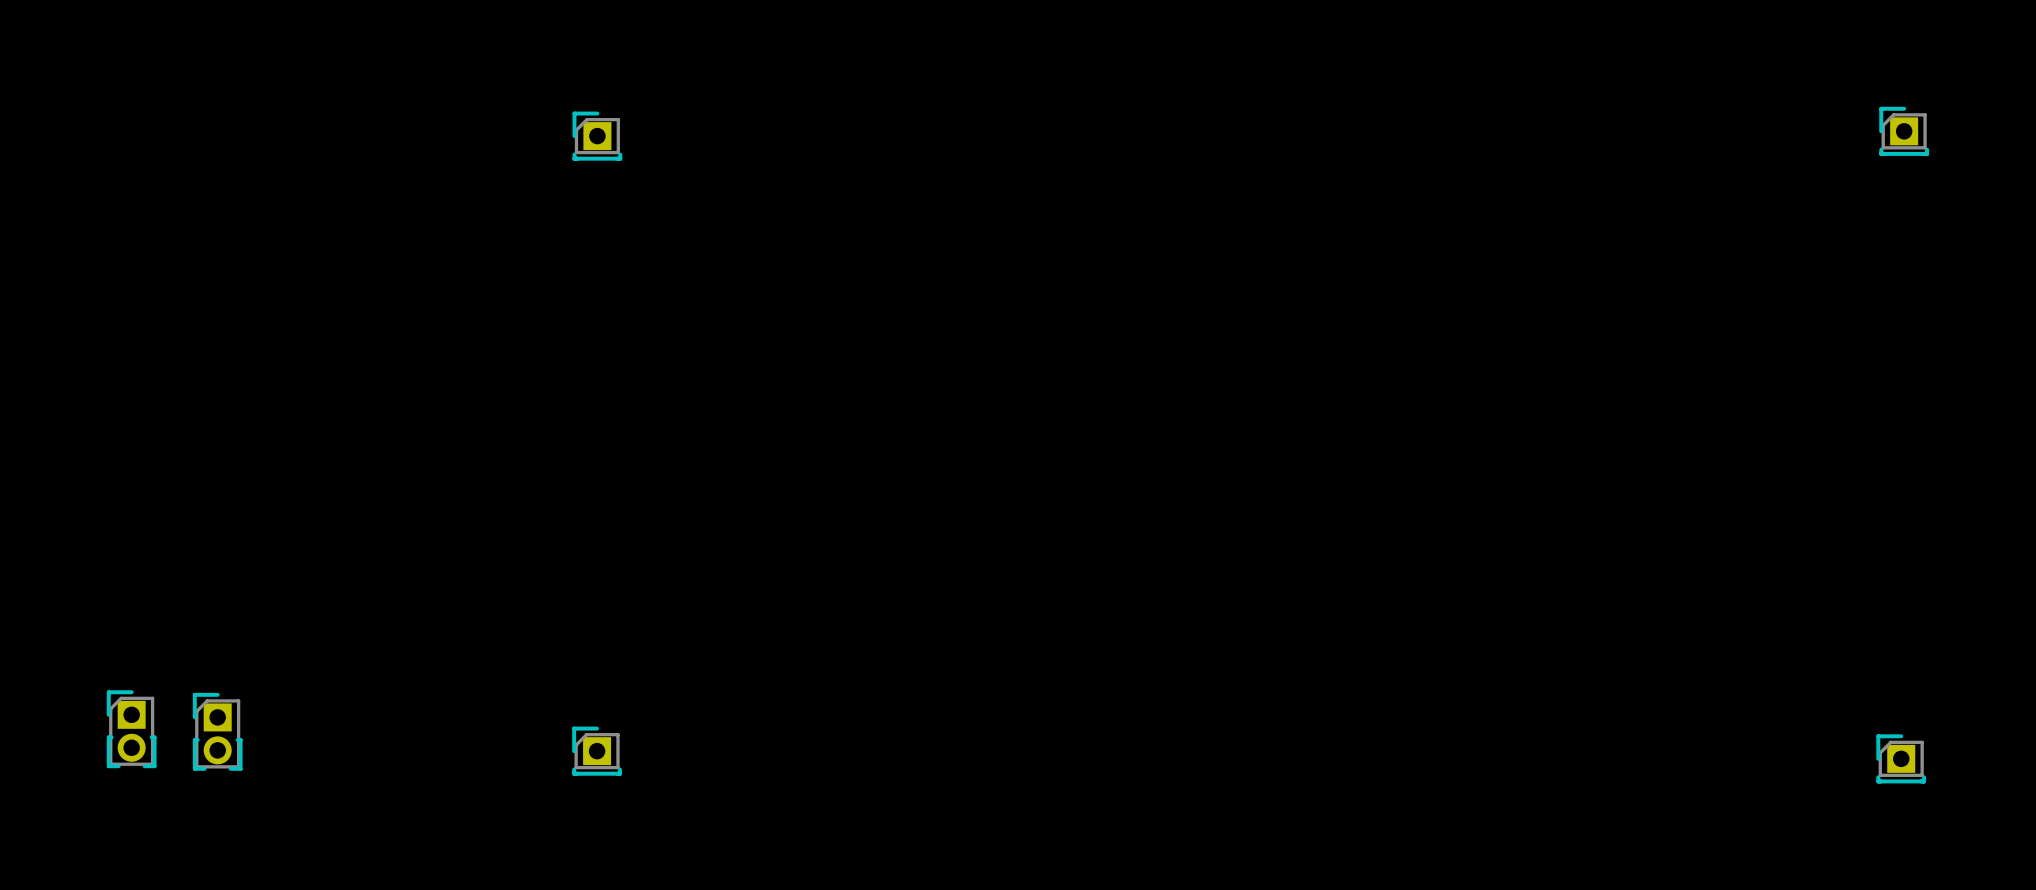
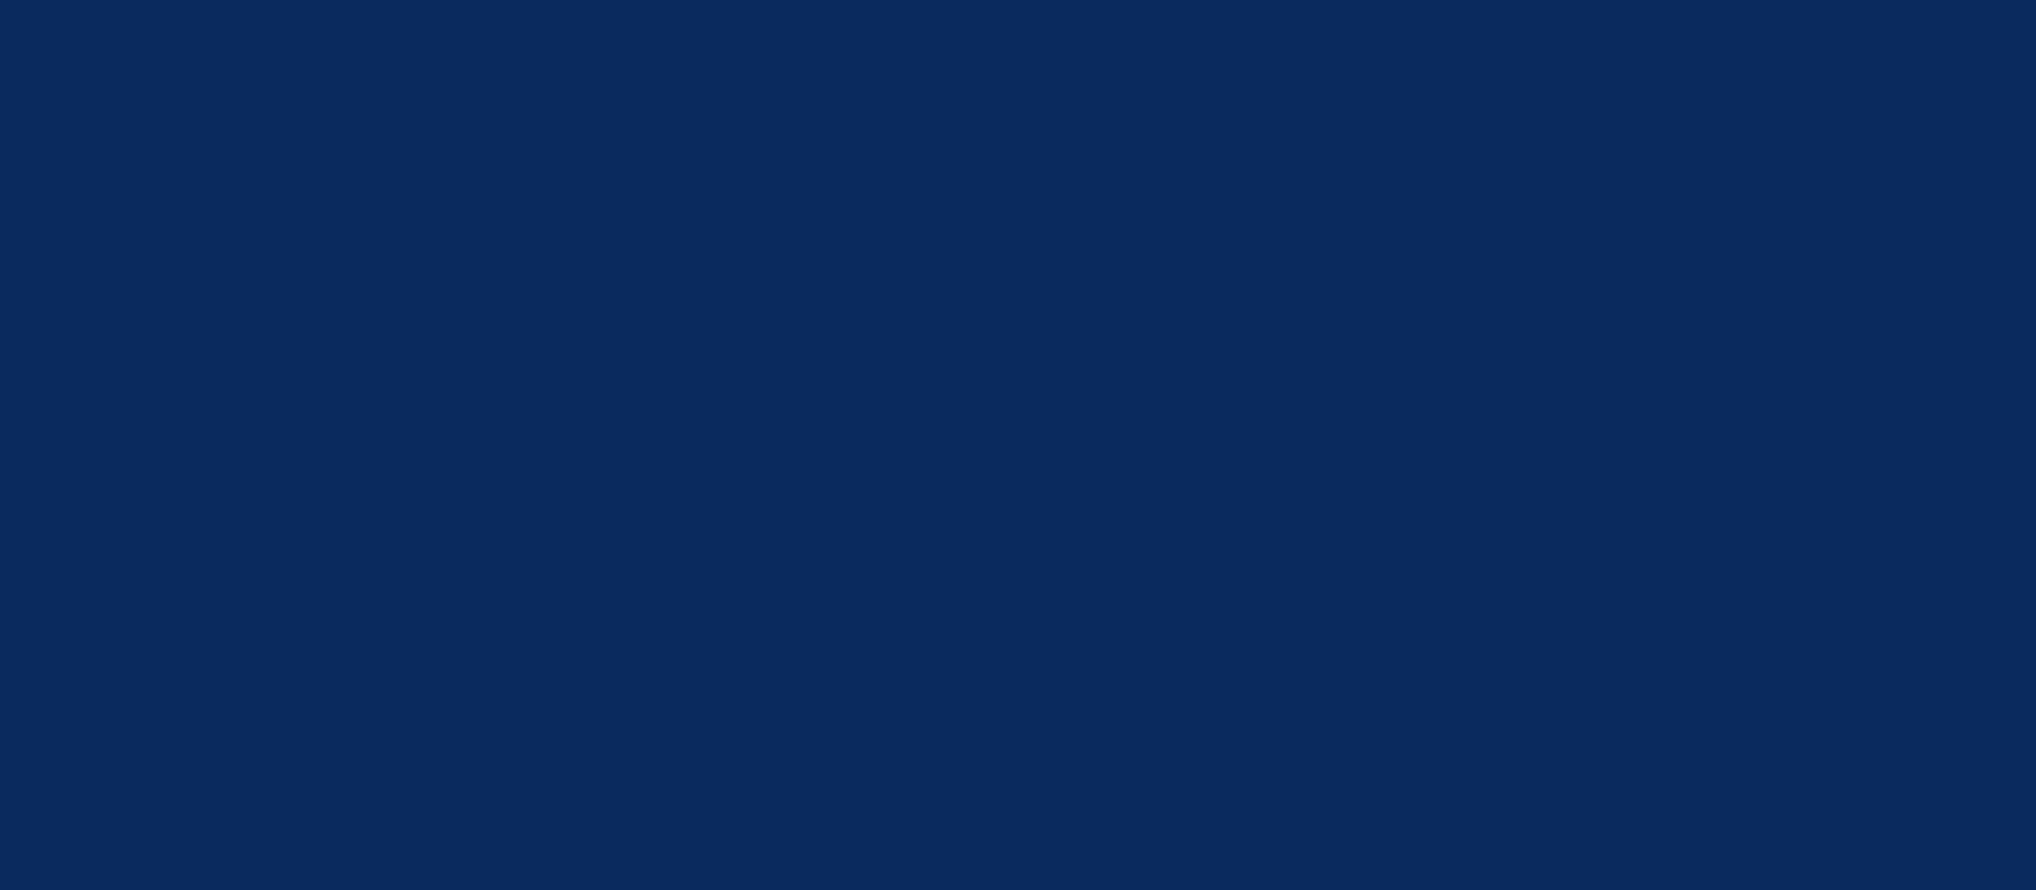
part: (1904, 131) -> none
part: (597, 136) -> none
part: (131, 729) -> none
part: (217, 731) -> none
part: (597, 751) -> none
part: (1901, 758) -> none

